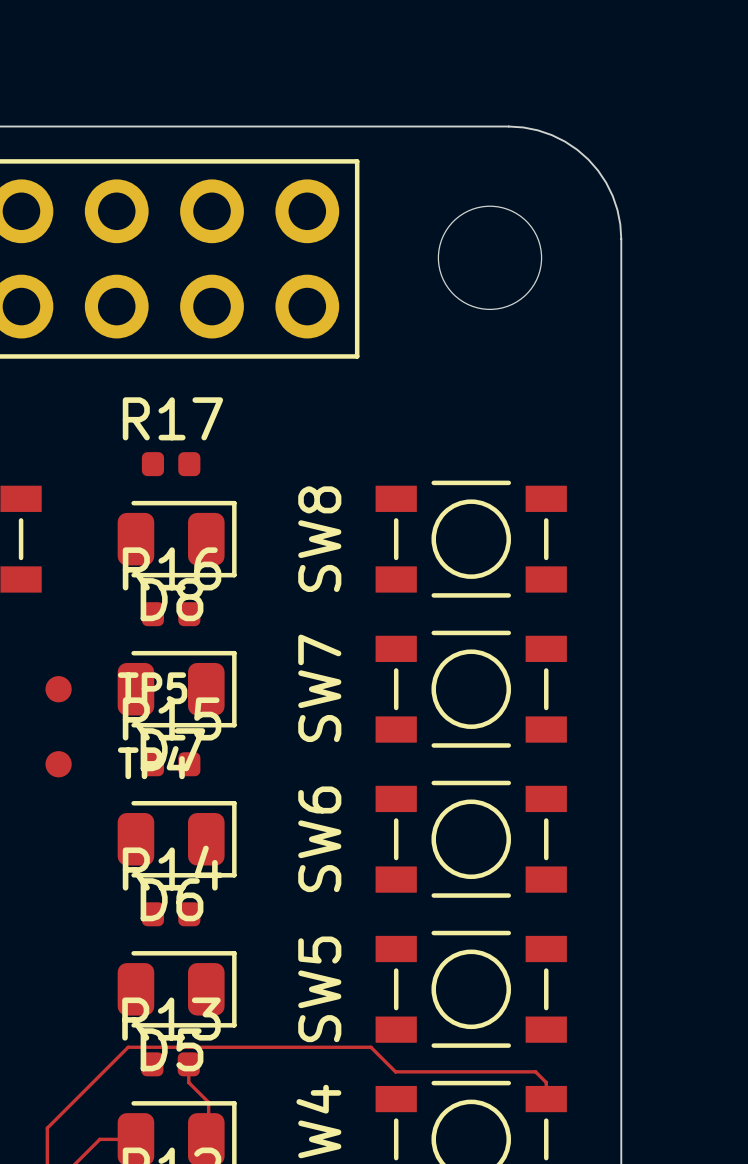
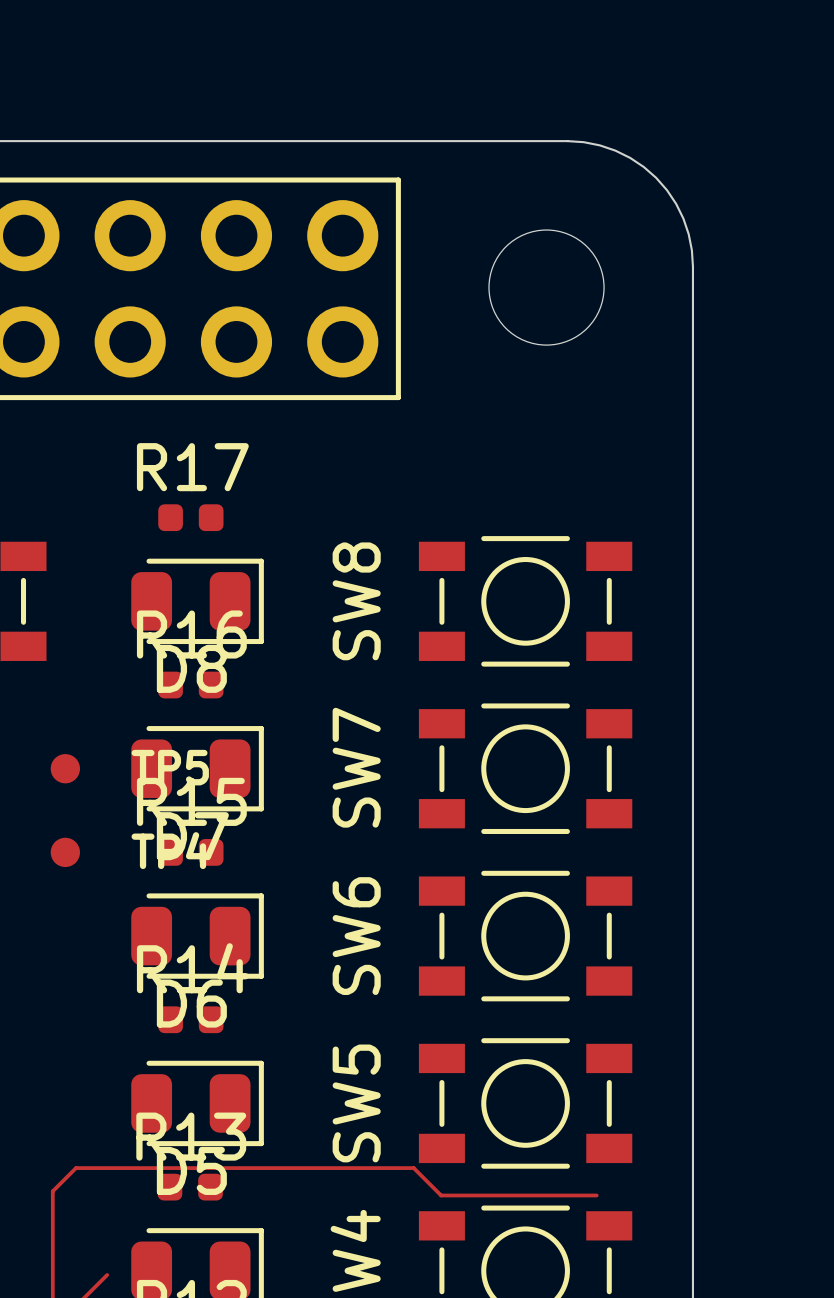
track: (128, 1047) (47, 1128) -> (142, 1168) (76, 1168) (52, 1191) (52, 1258)
track: (188, 1064) (188, 1082) (208, 1102) (208, 1137) (206, 1139) -> none
track: (535, 1071) (546, 1082) (546, 1099) -> none
track: (135, 1139) (99, 1139) (96, 1143) -> none

